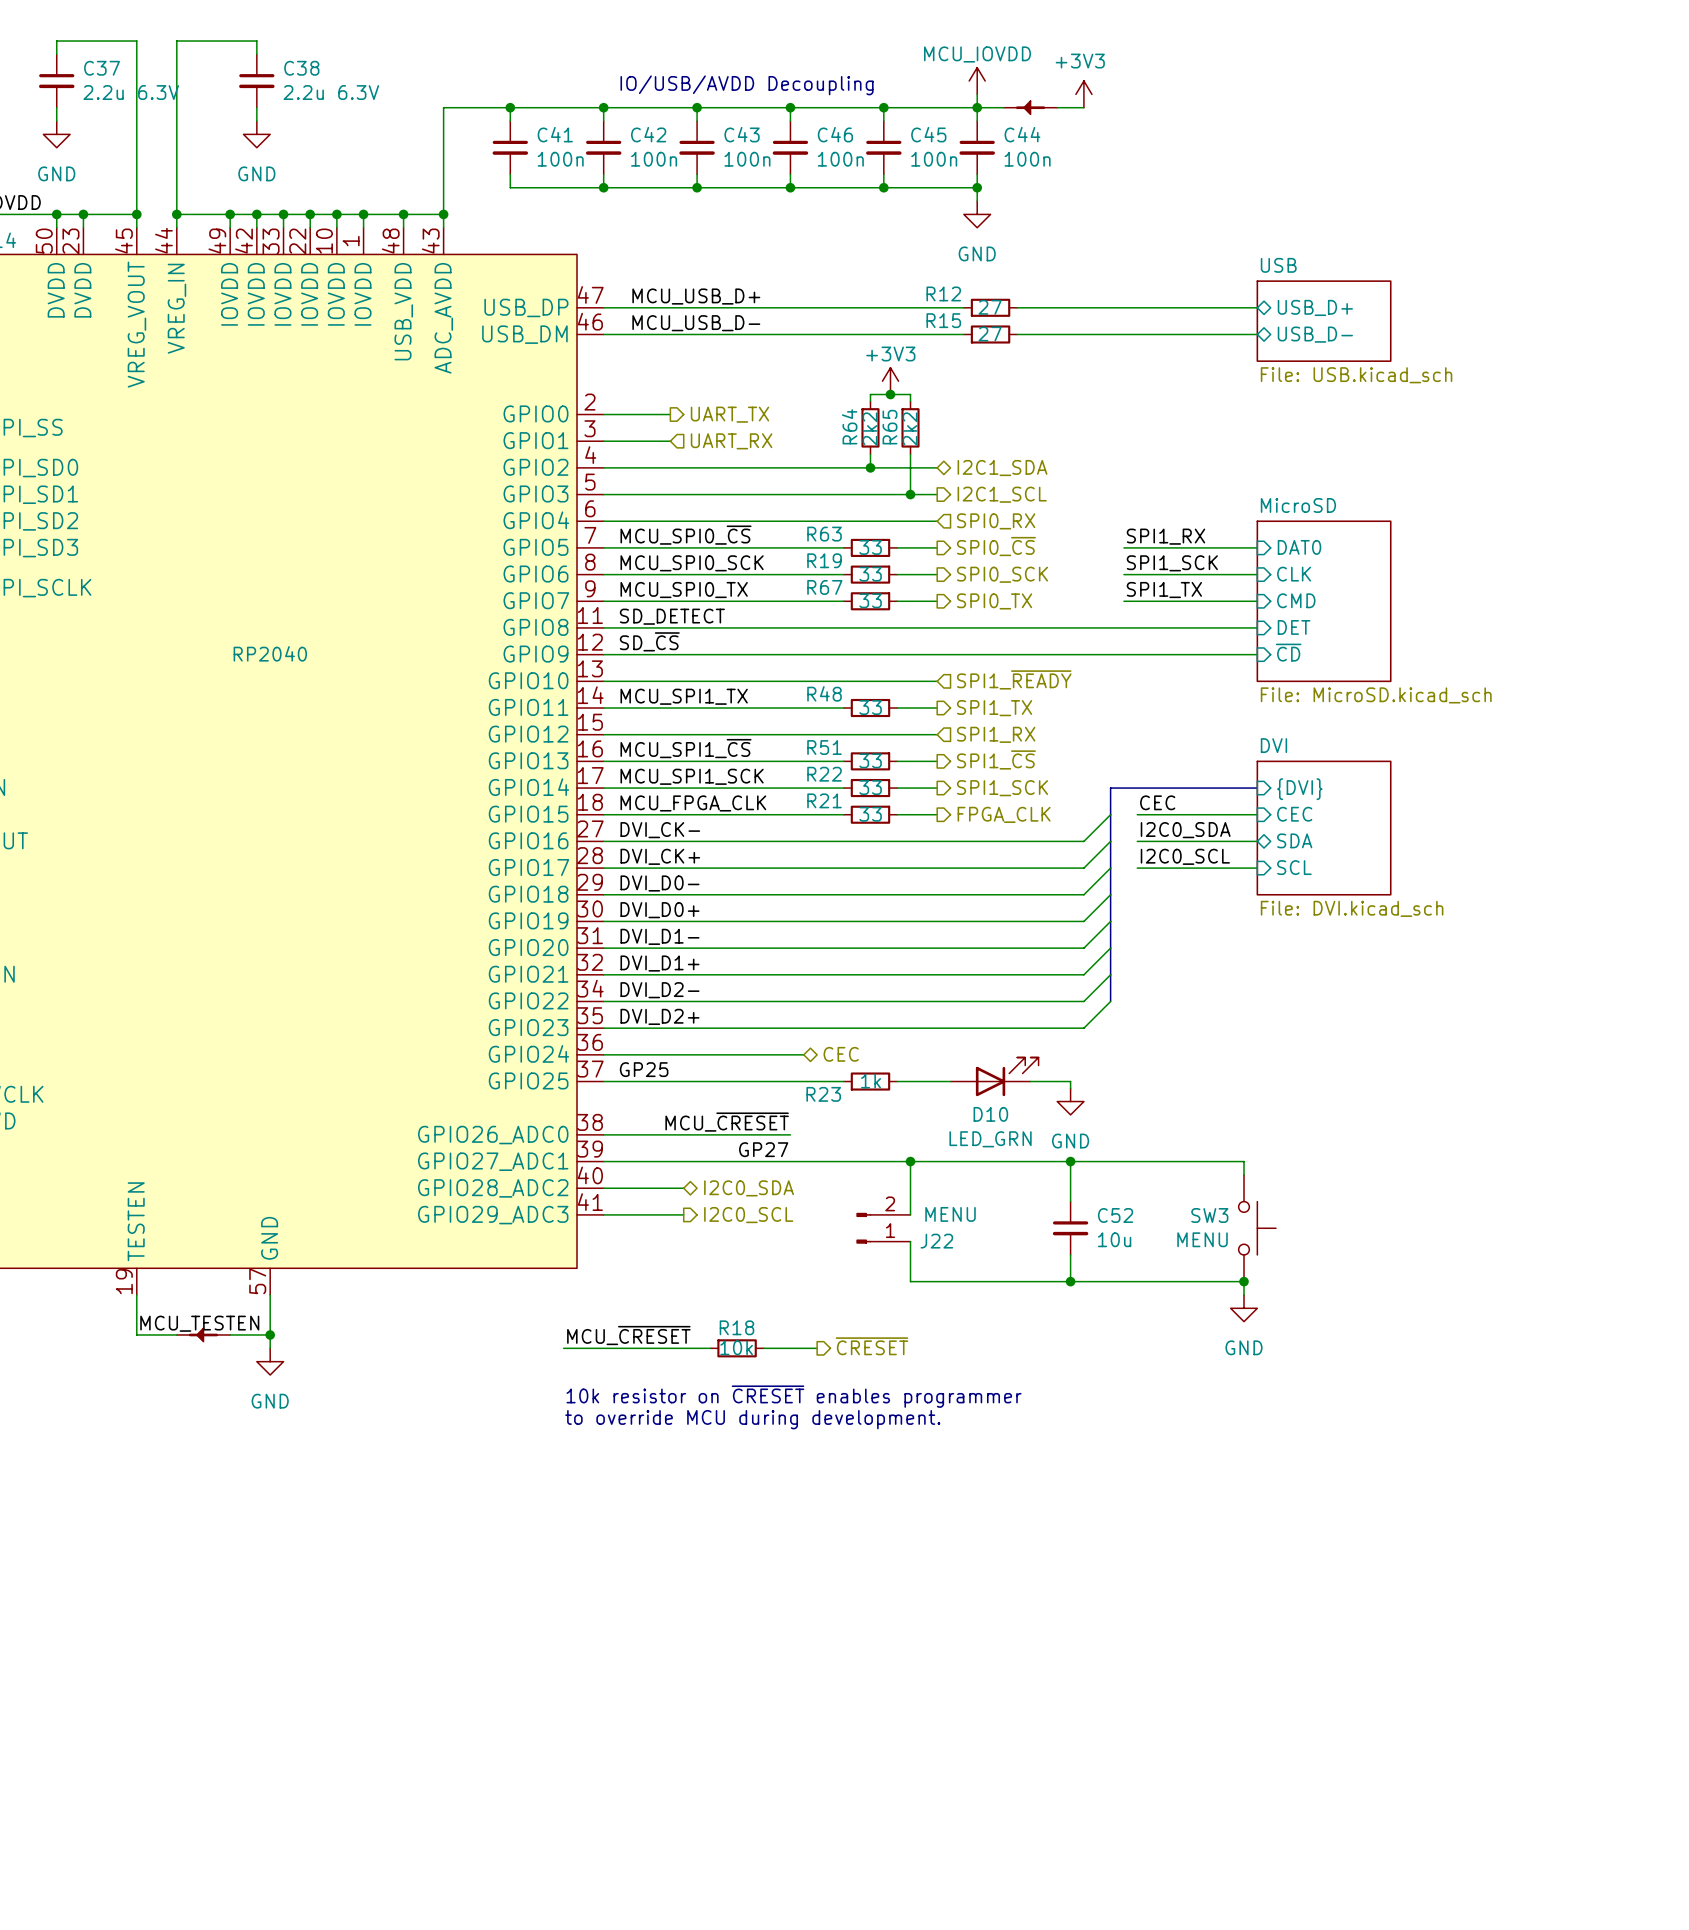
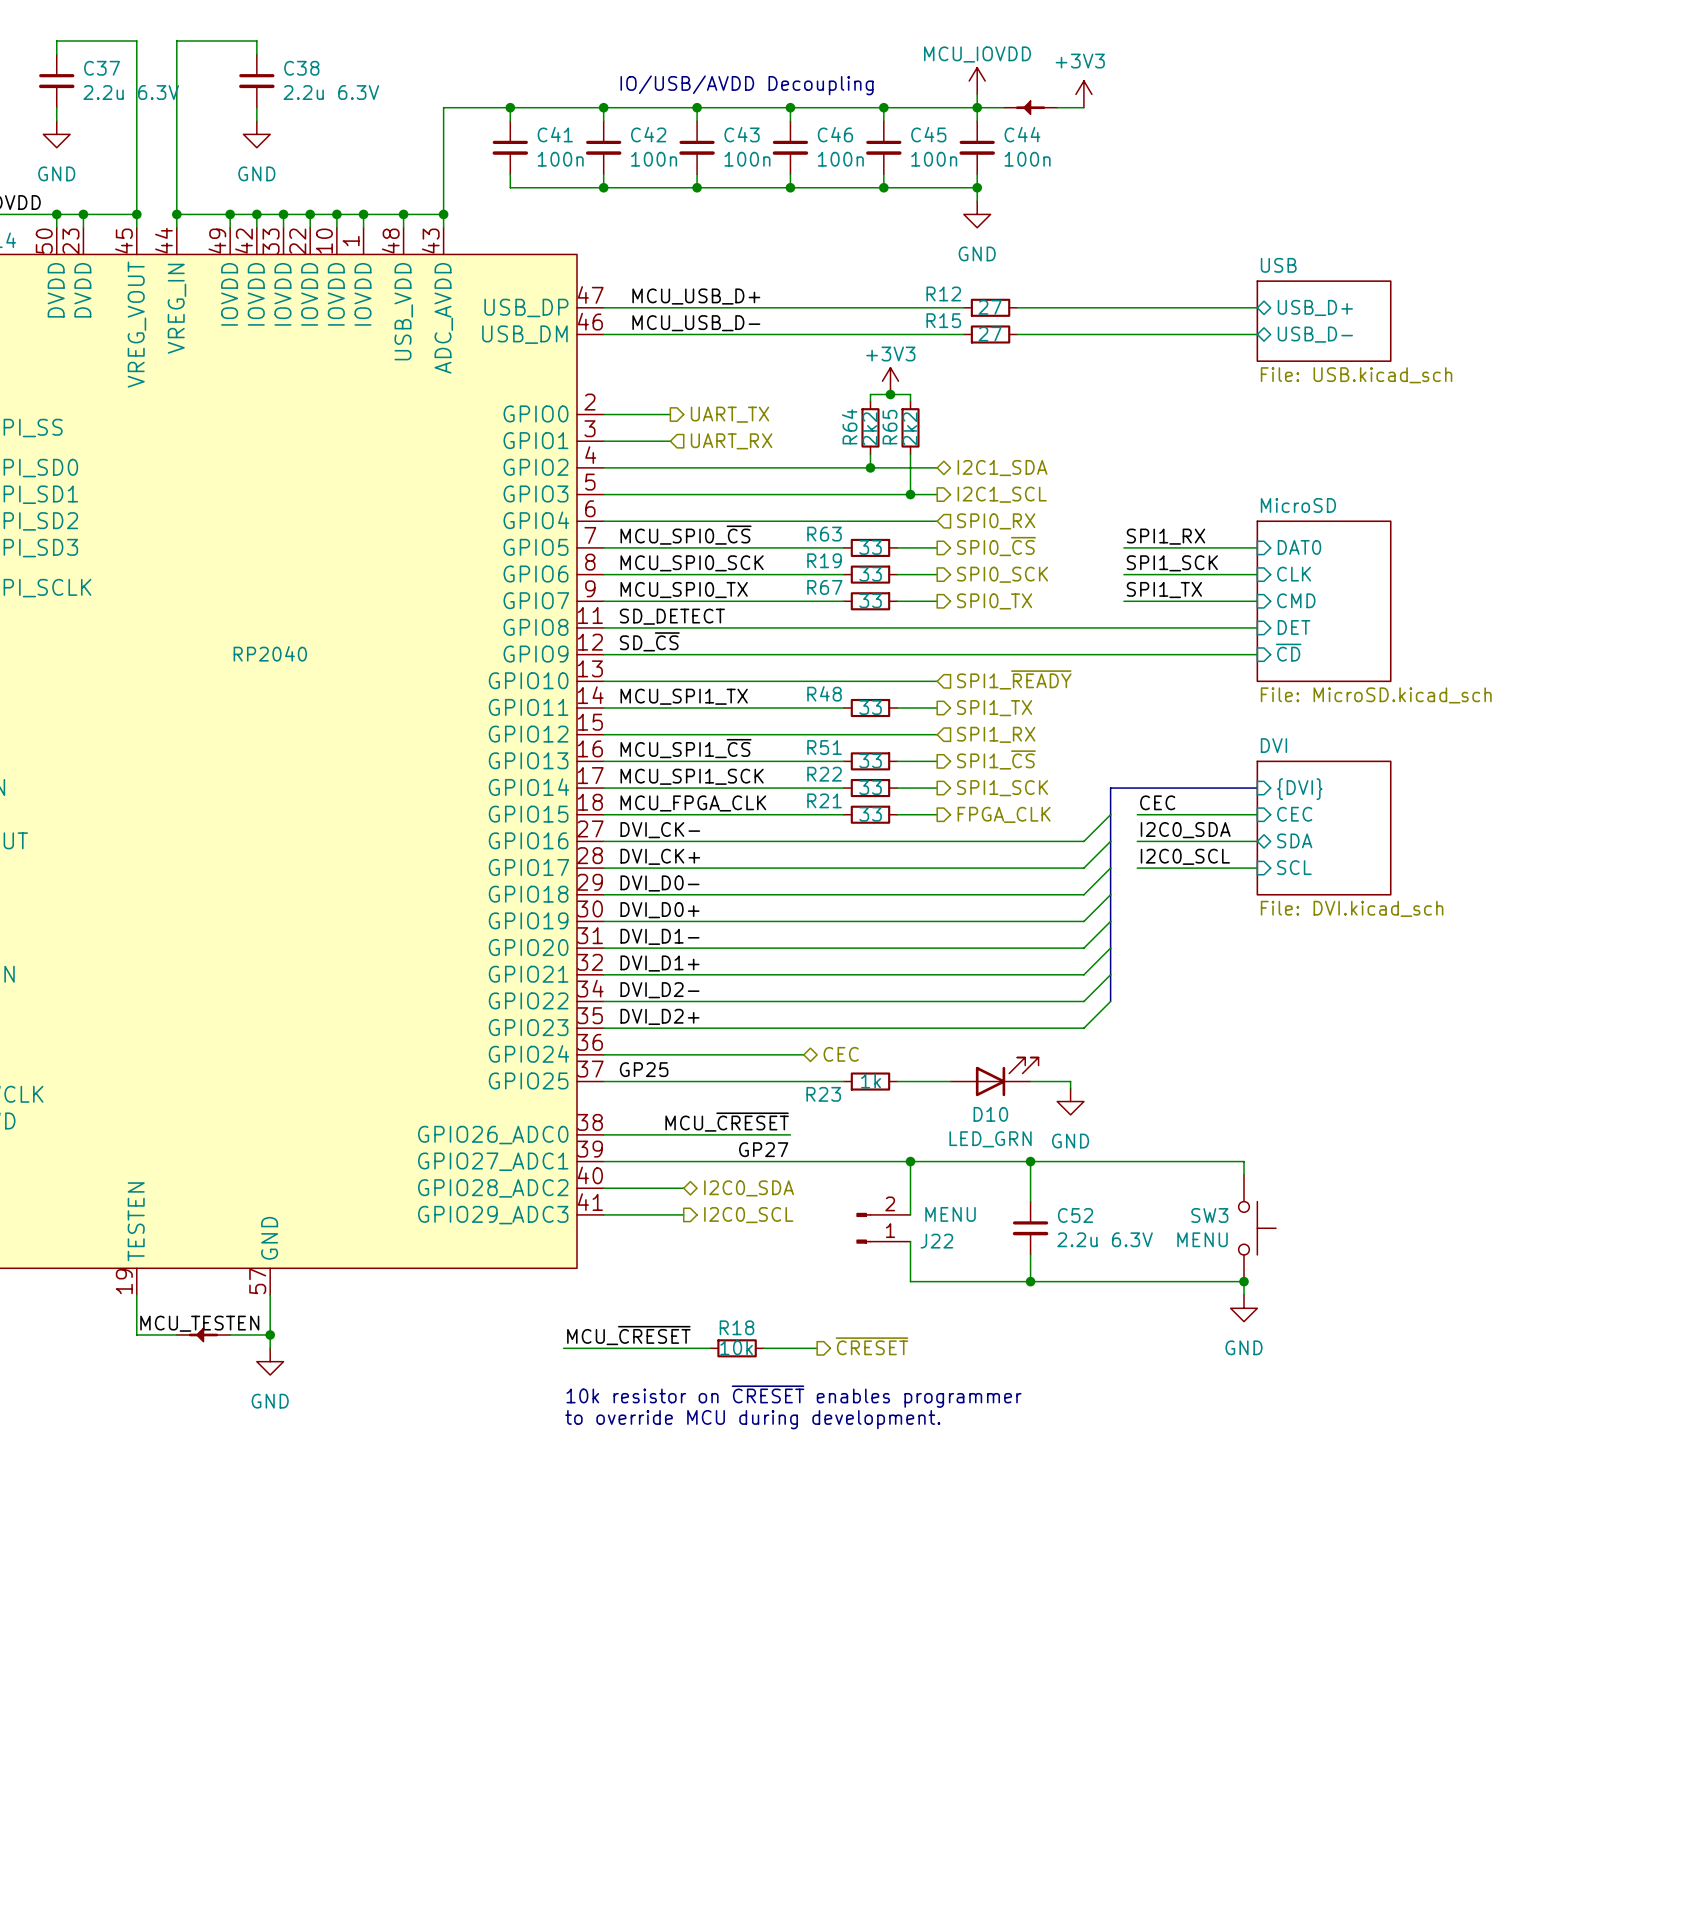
wire: (1070, 1161) (1070, 1201) -> (1030, 1161) (1030, 1201)
junction position: (1070, 1161) -> (1030, 1161)
C52 position: (1070, 1228) -> (1030, 1228)
C52 value: 10u (1114, 1239) -> 2.2u 6.3V (1105, 1239)
wire: (1070, 1254) (1070, 1281) -> (1030, 1254) (1030, 1281)
junction position: (1070, 1281) -> (1030, 1281)

